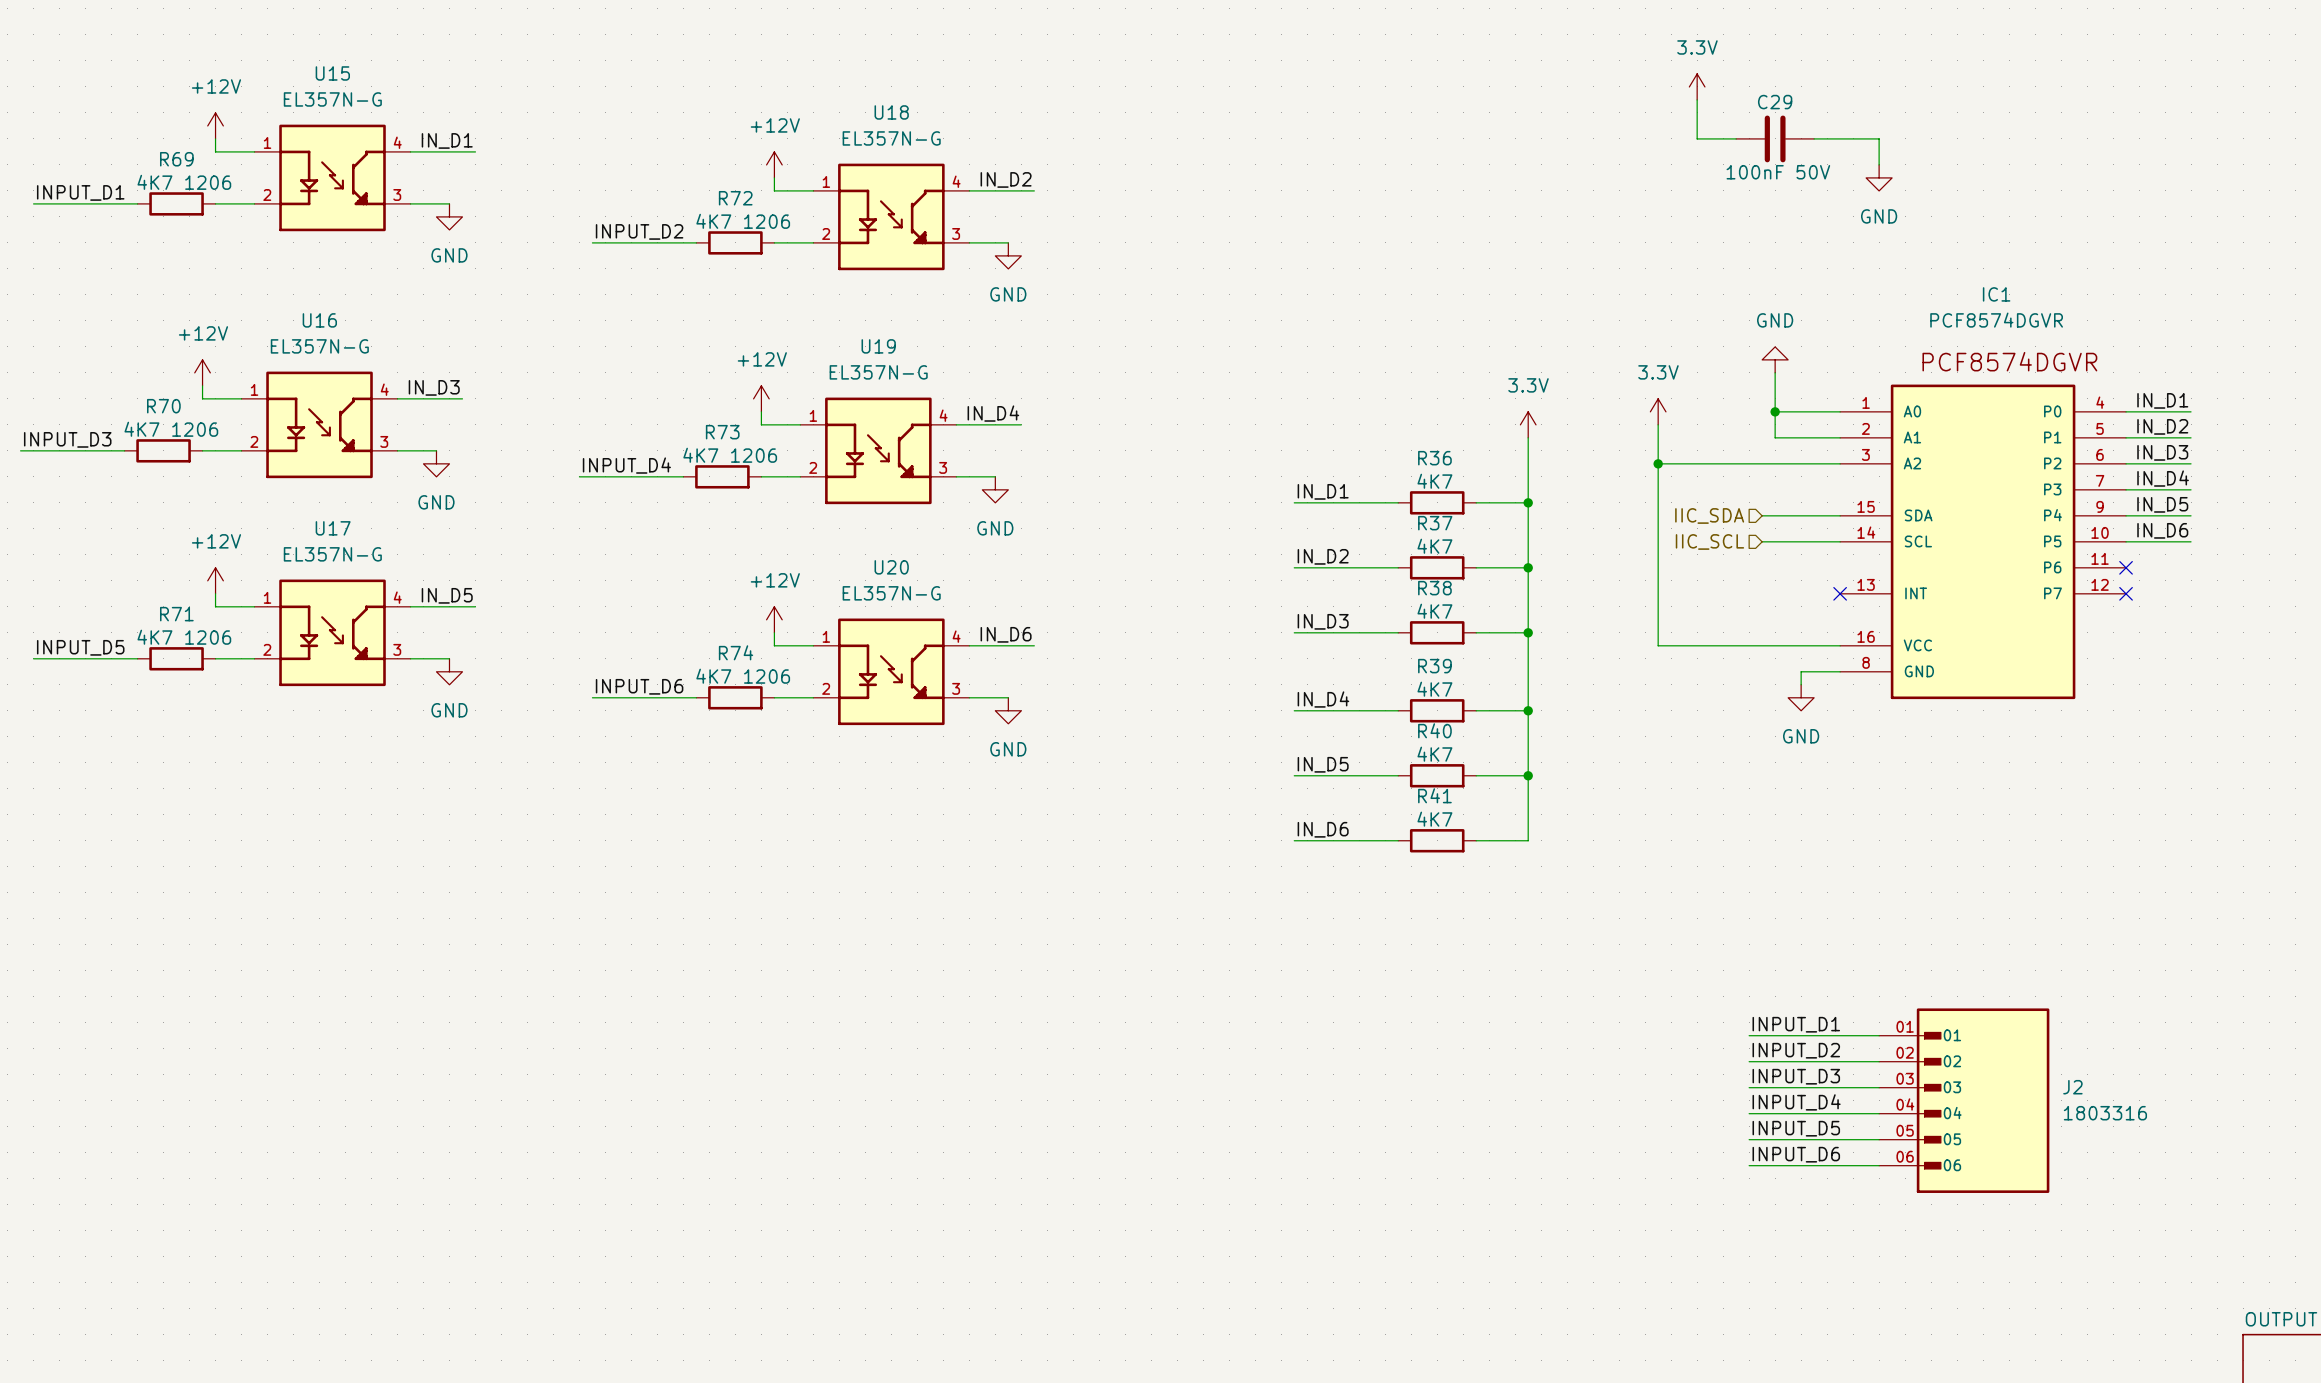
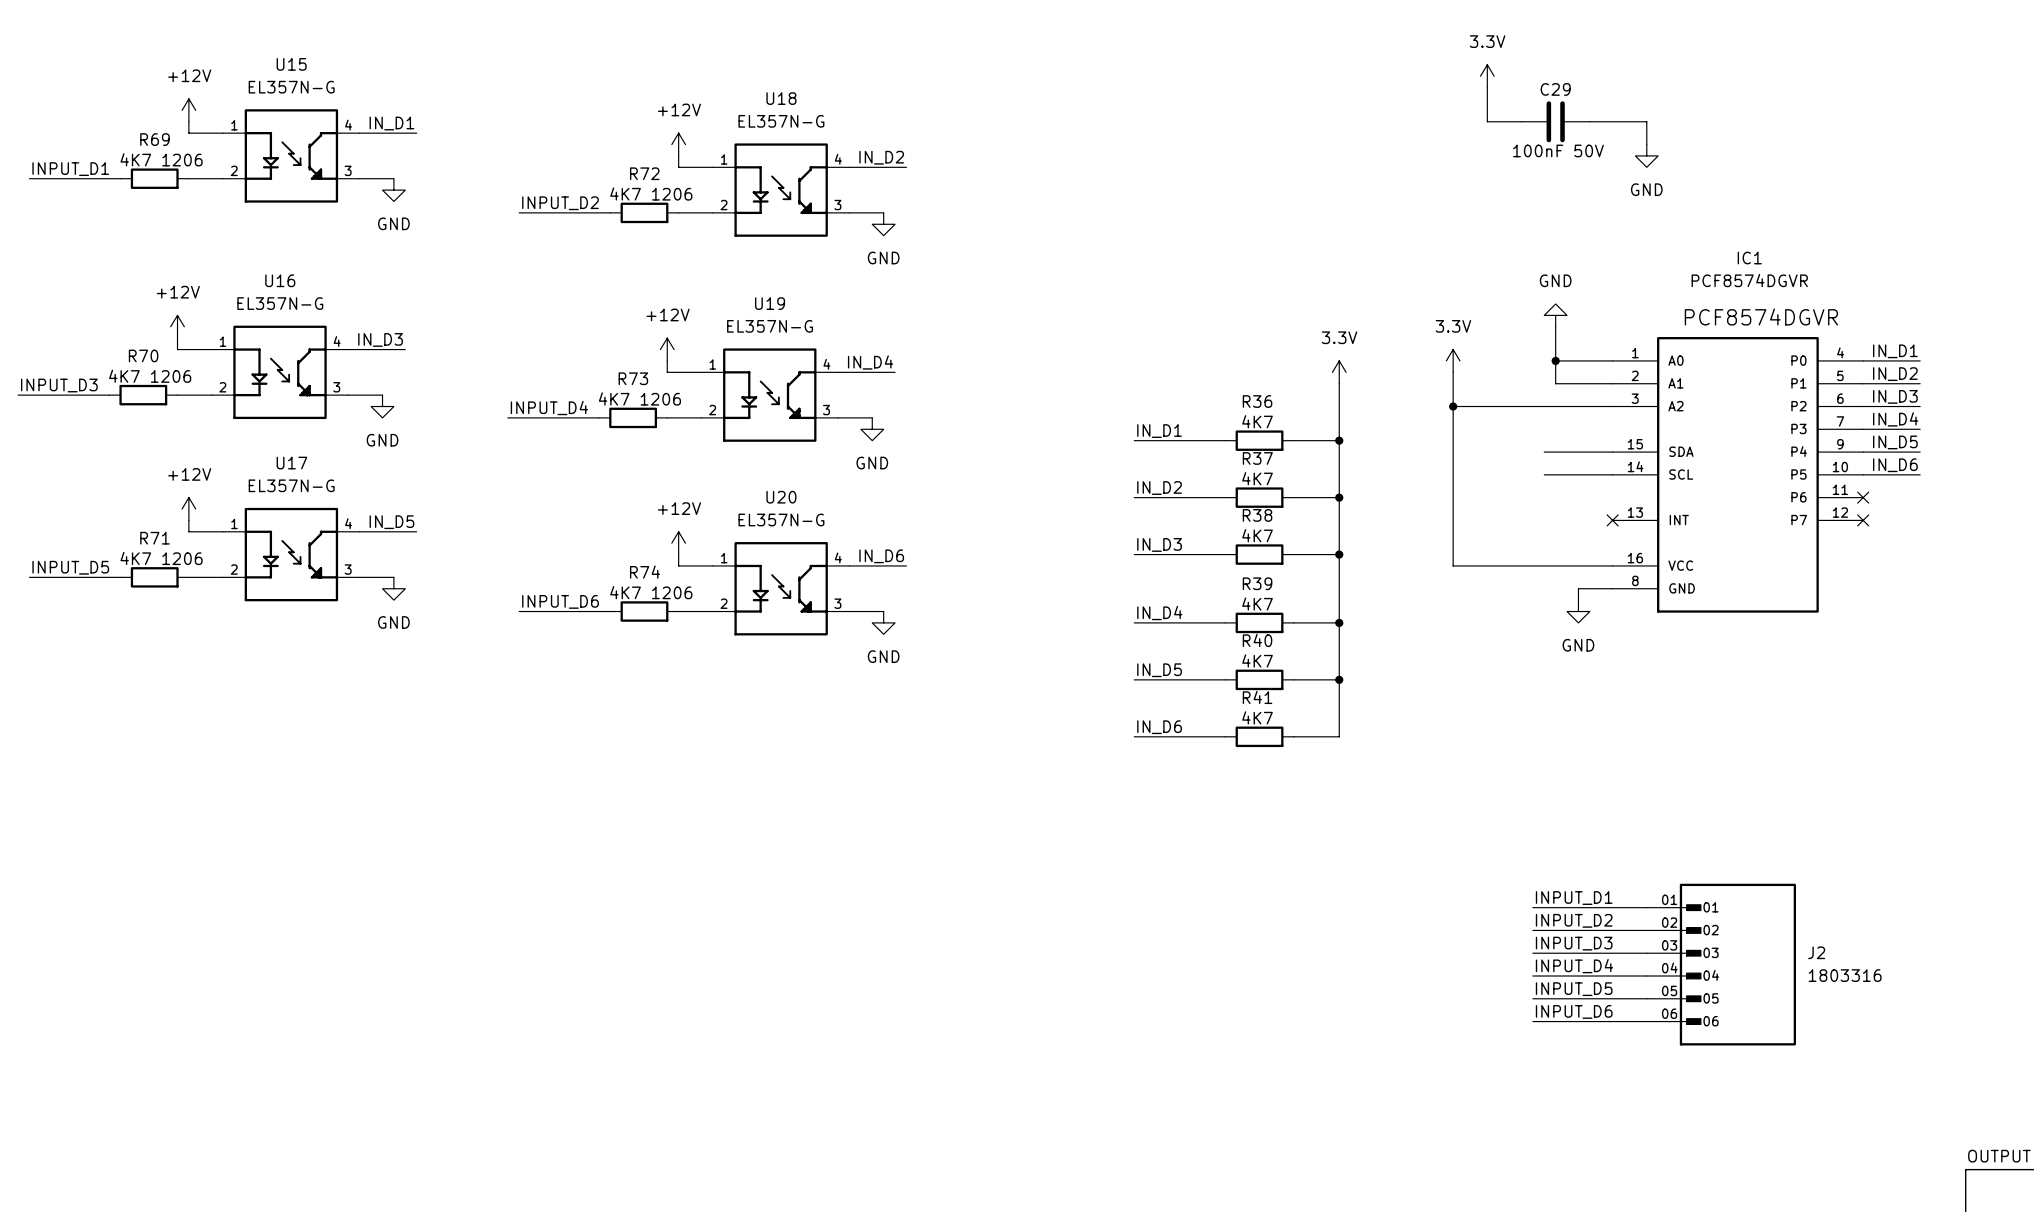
hierarchical label: IIC_SDA (1709, 515) -> none
hierarchical label: IIC_SCL (1709, 541) -> none

